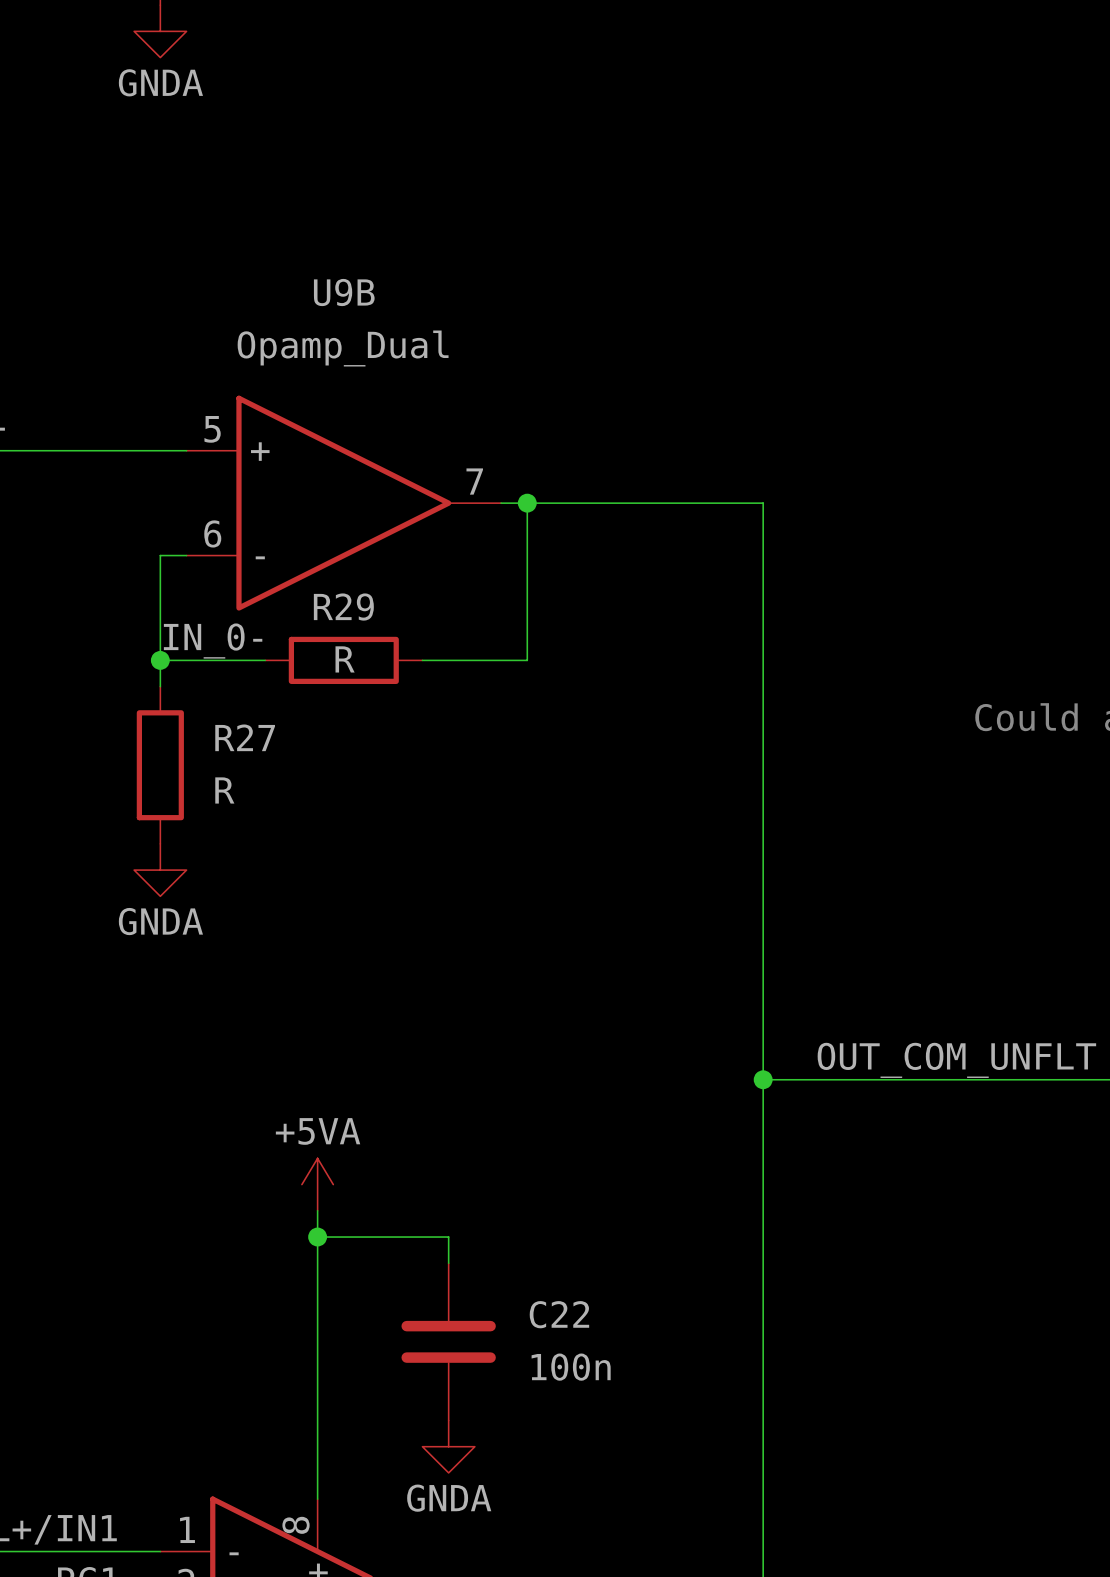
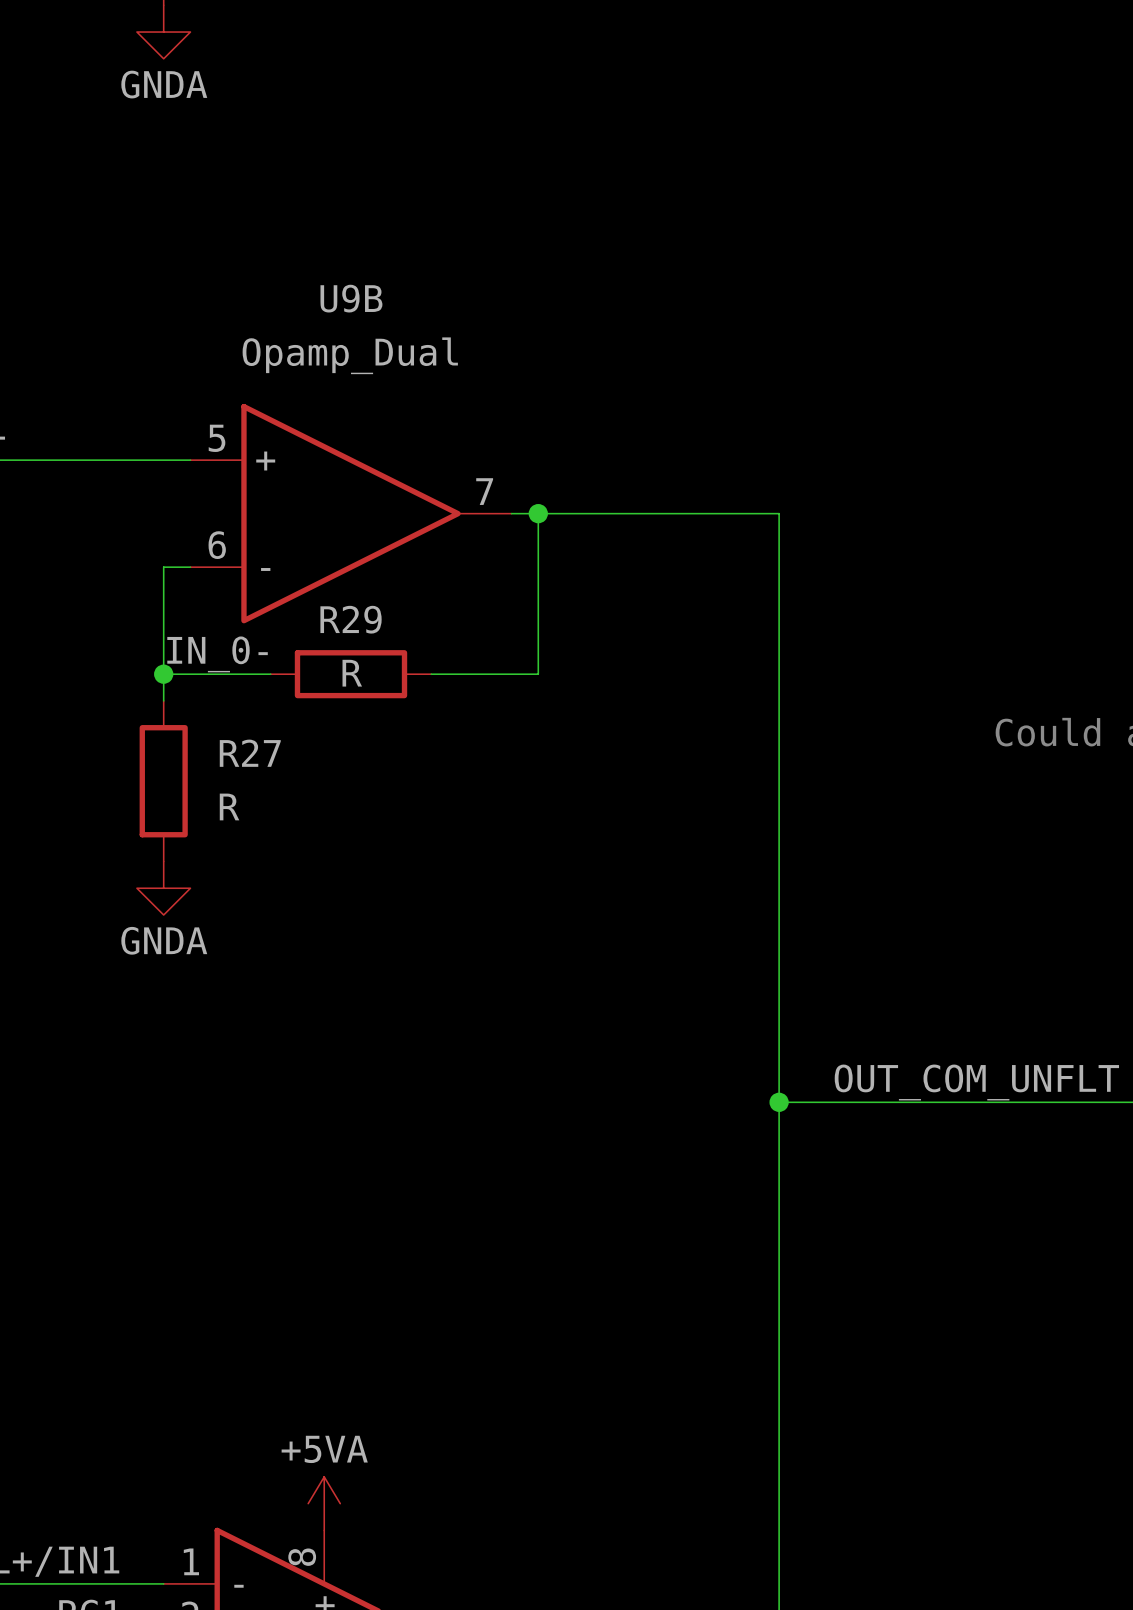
power symbol position: +5VA (317, 1184) -> +5VA (324, 1503)
wire: (317, 1210) (317, 1499) -> none
wire: (317, 1237) (448, 1237) (448, 1263) -> none
junction: (317, 1237) -> none
C22: 100n (448, 1341) -> none
power symbol: GNDA (448, 1446) -> none

